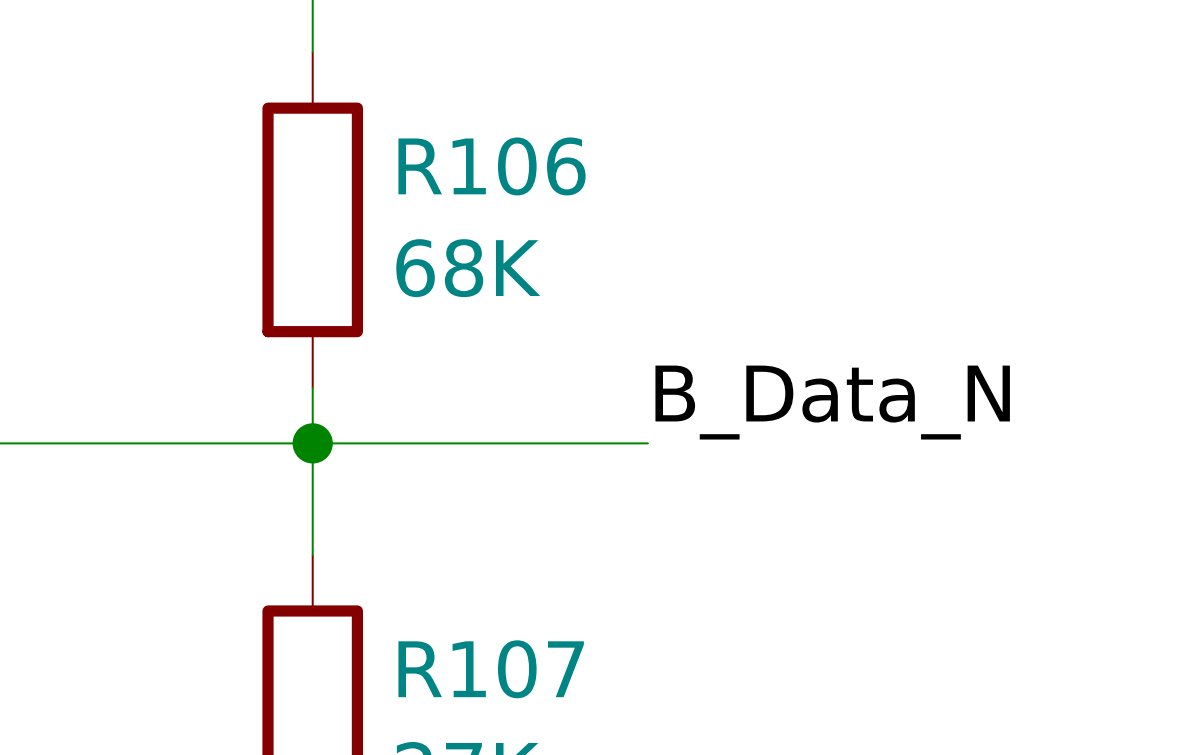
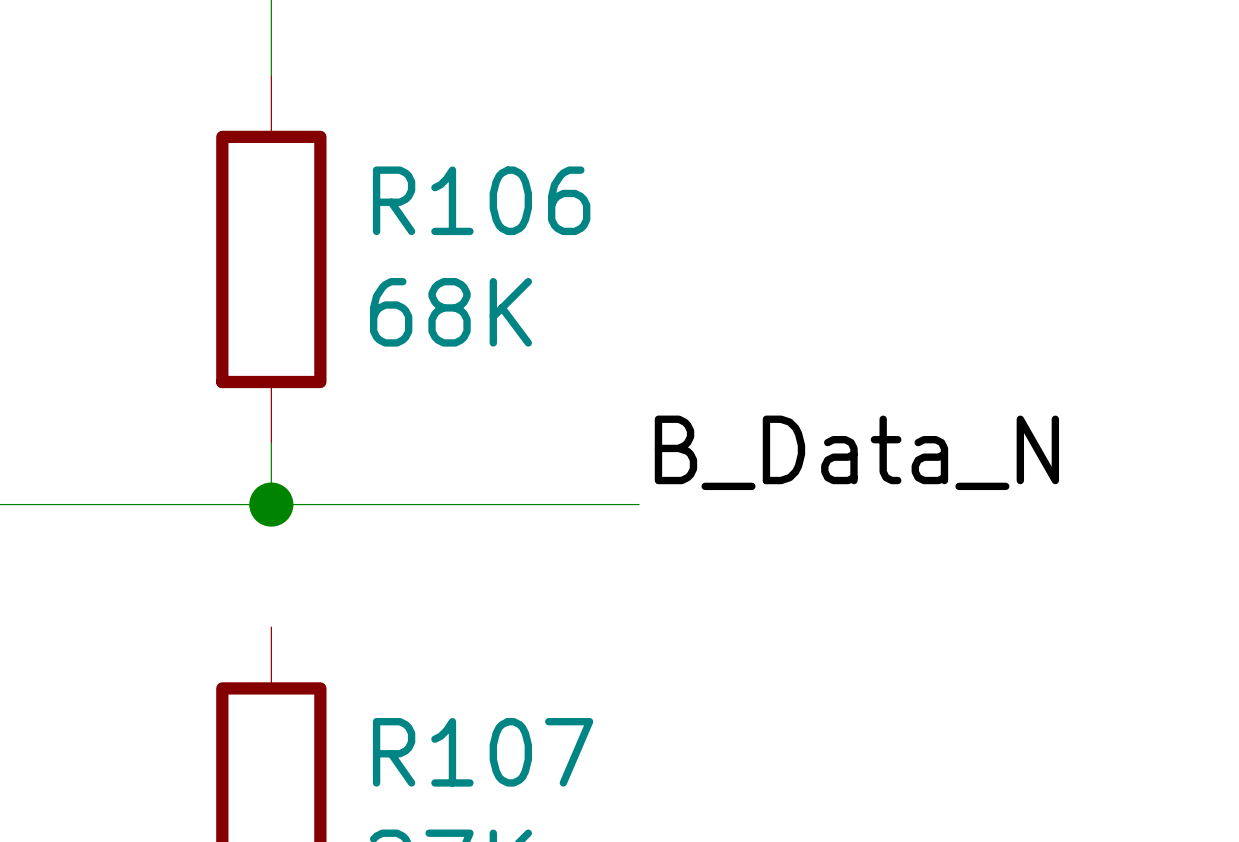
wire: (312, 443) (312, 555) -> none

